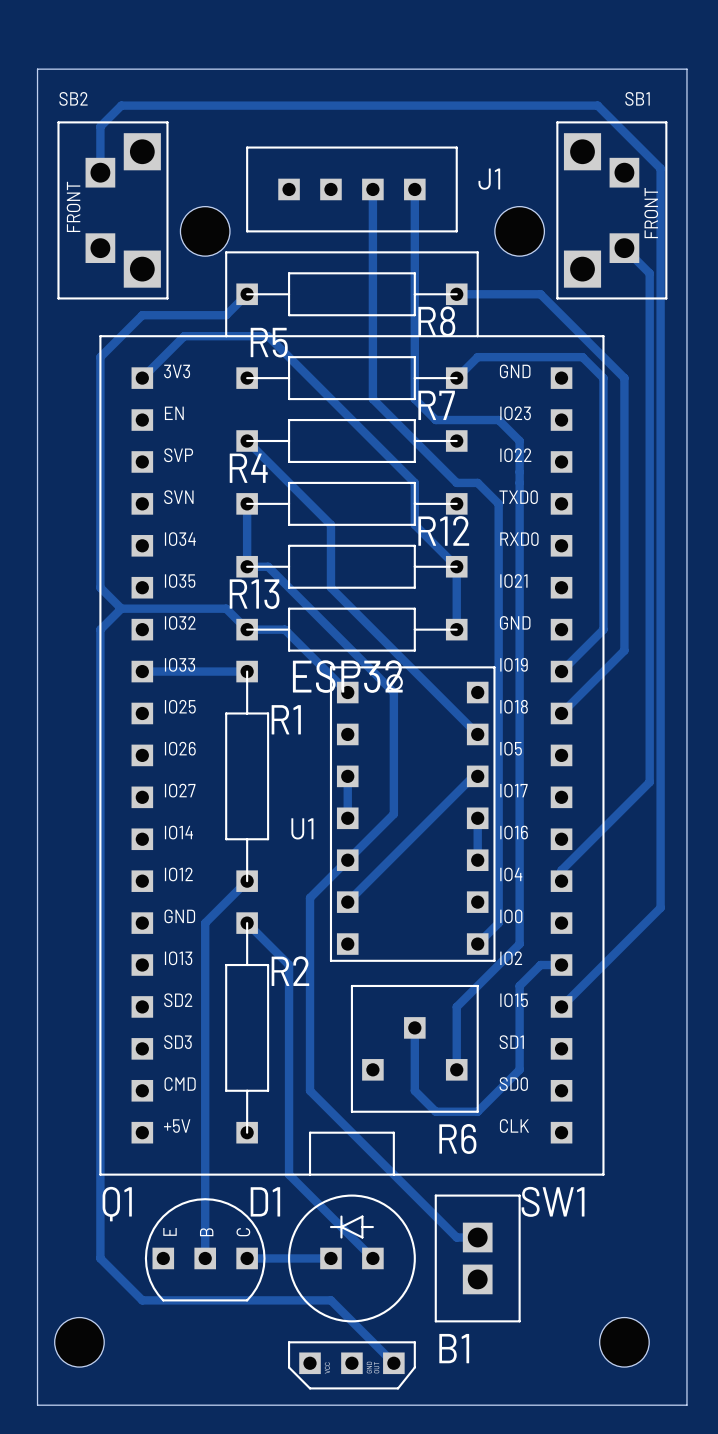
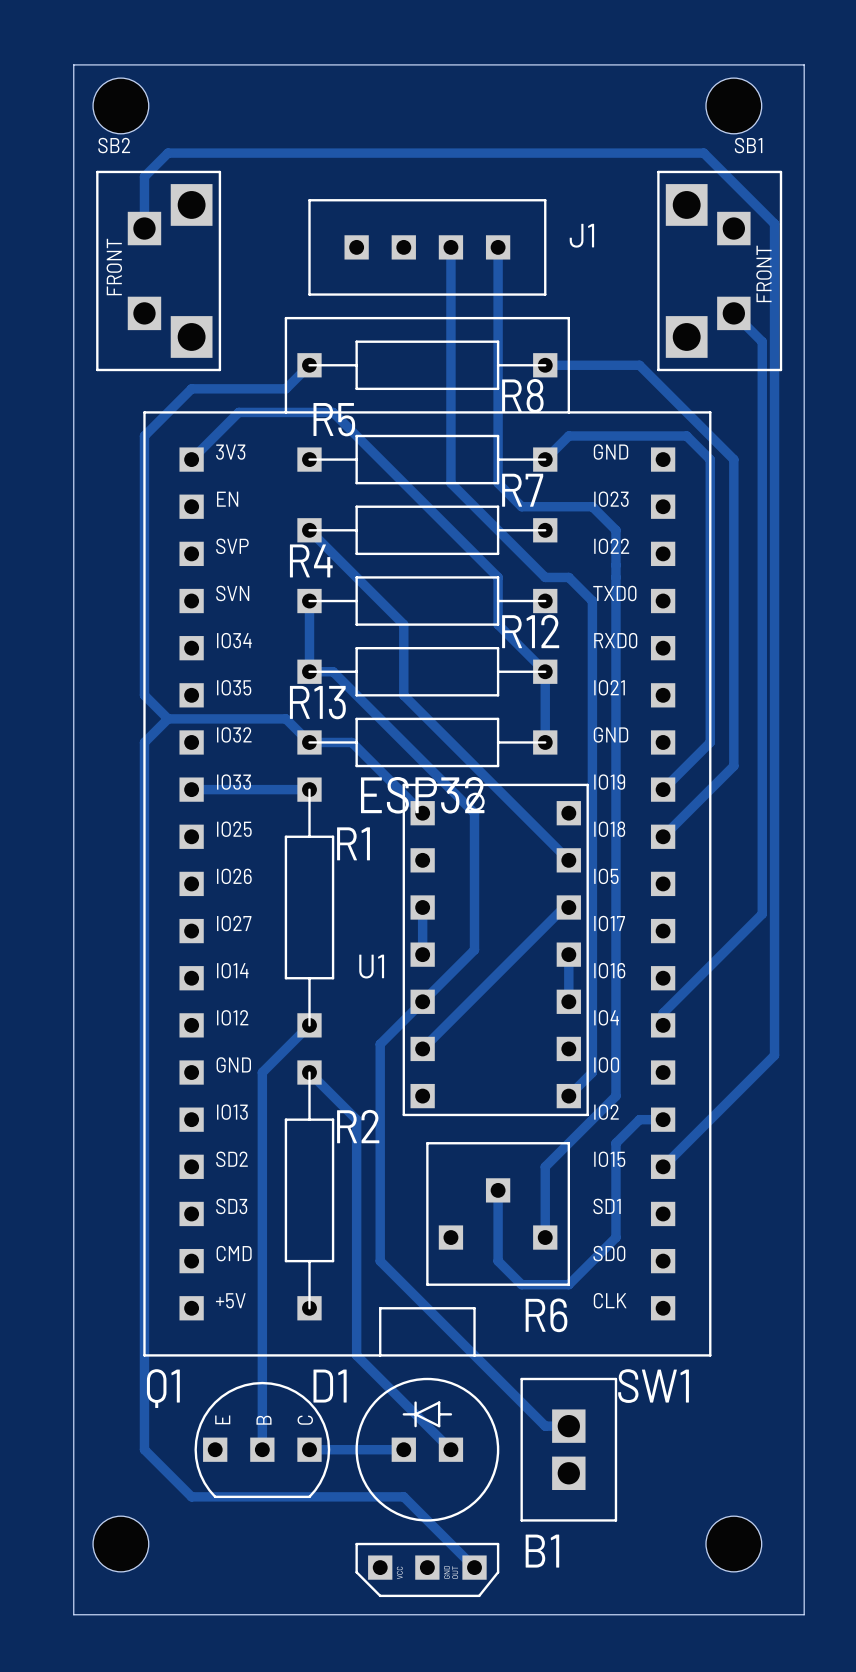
board edge: (37, 69) (686, 69) -> (73, 112) (73, 64) (804, 64) (804, 112)
hole position: (205, 231) -> (120, 105)
hole position: (519, 231) -> (733, 105)

